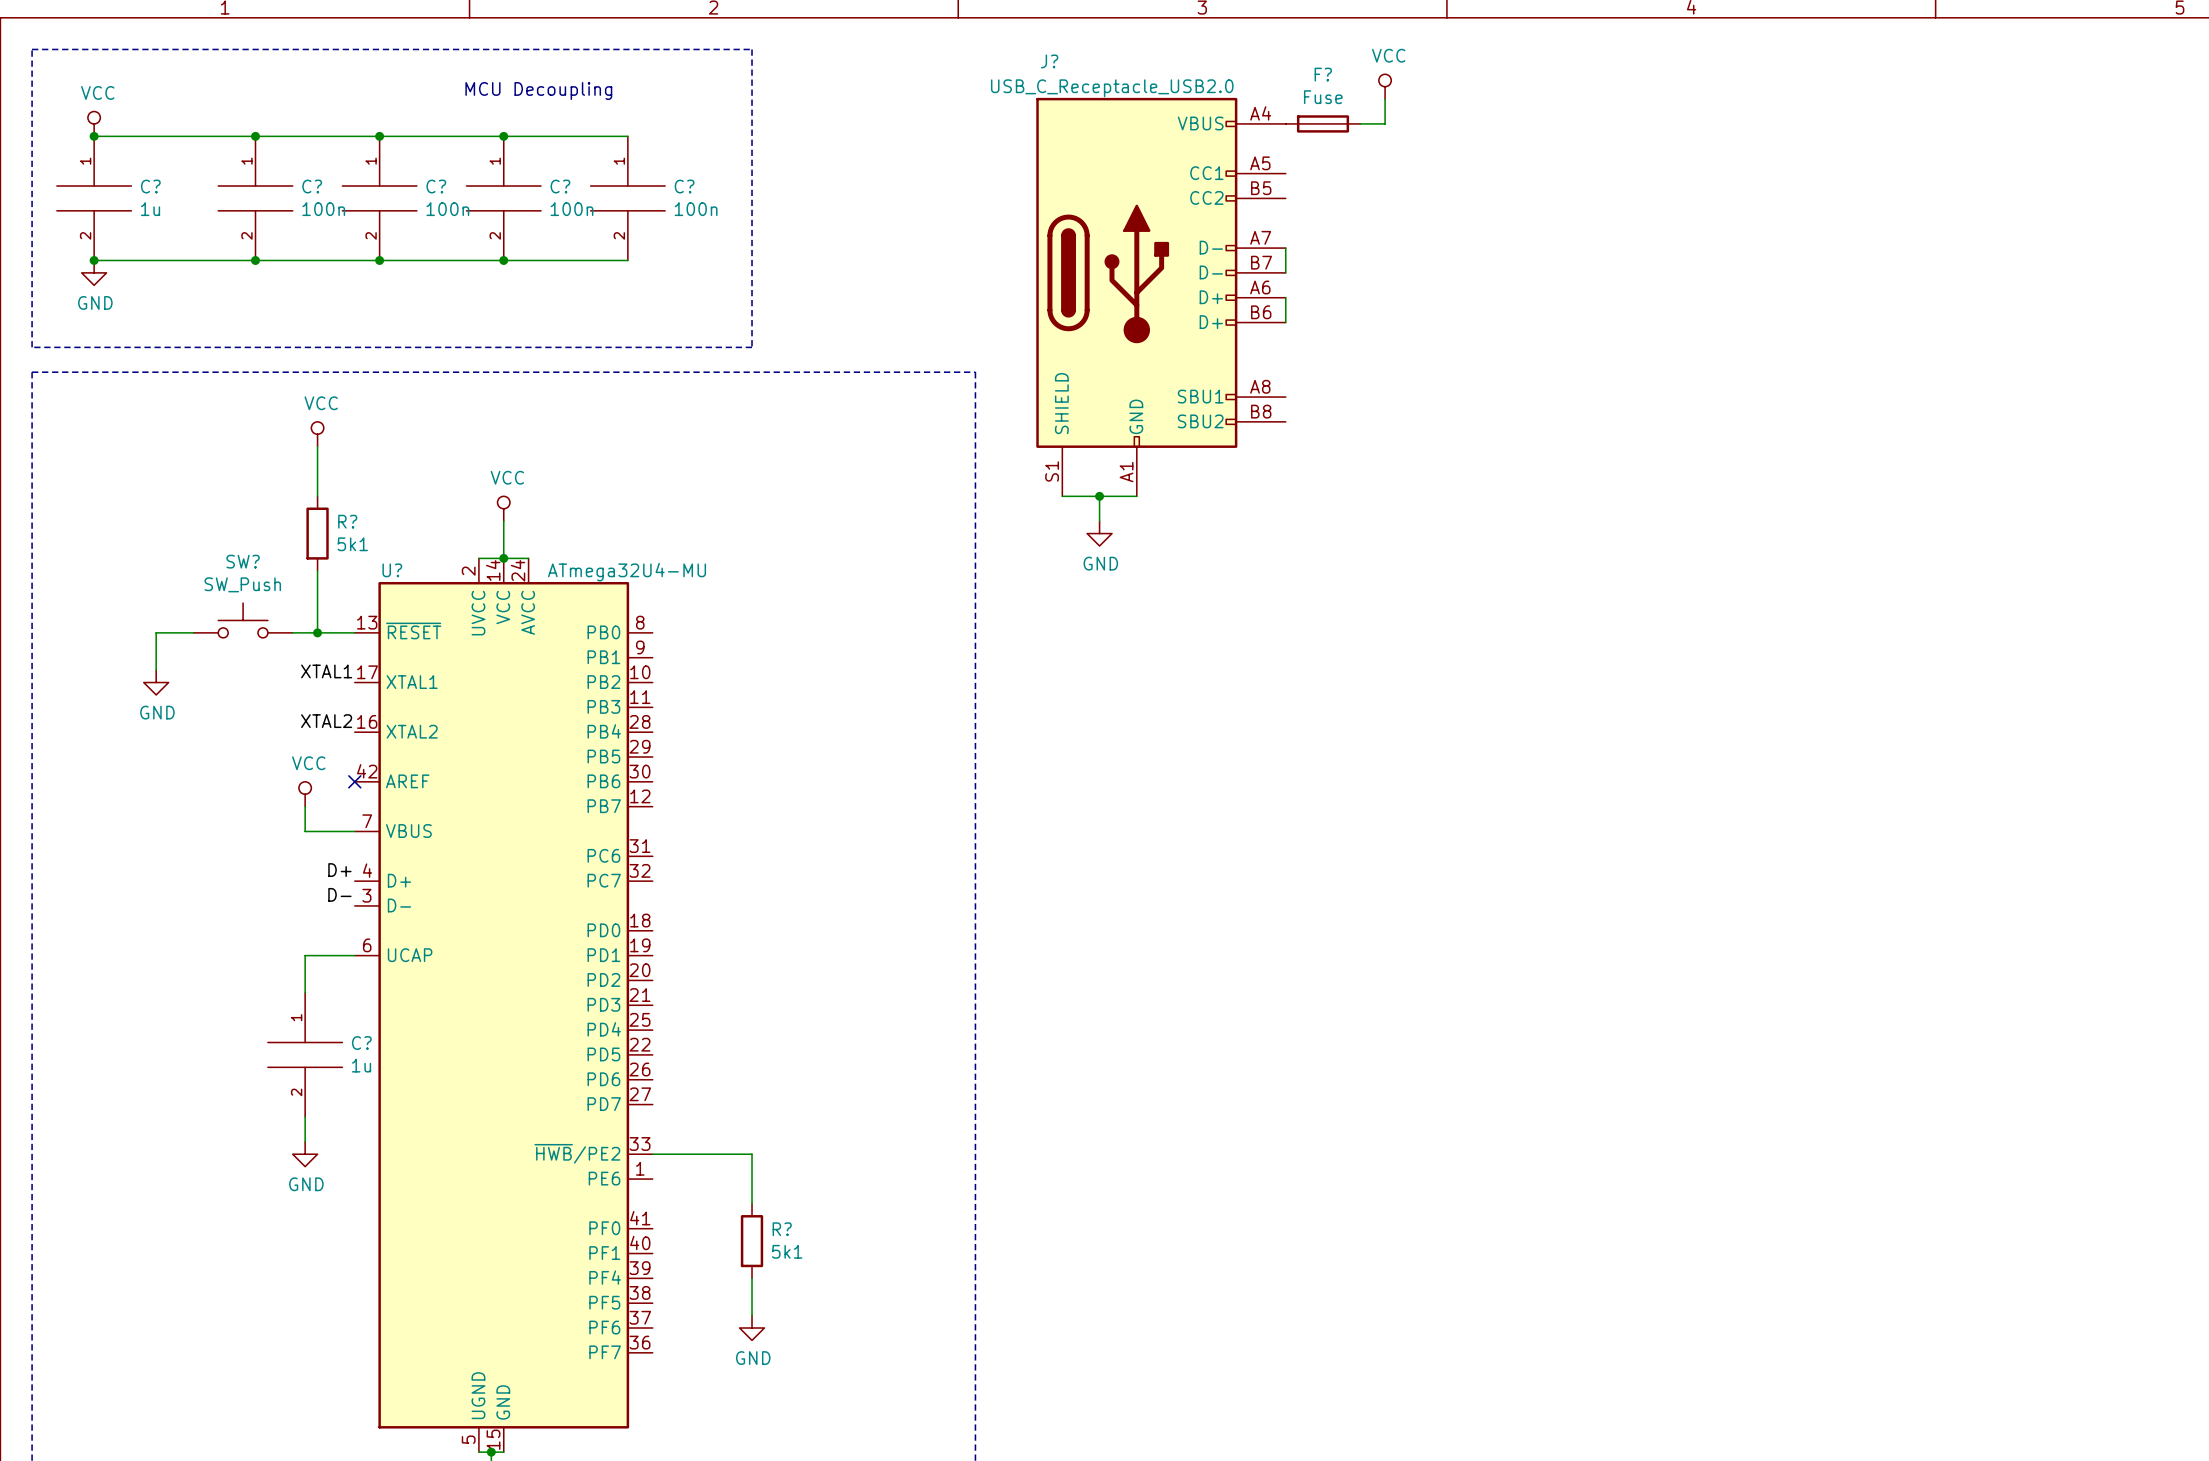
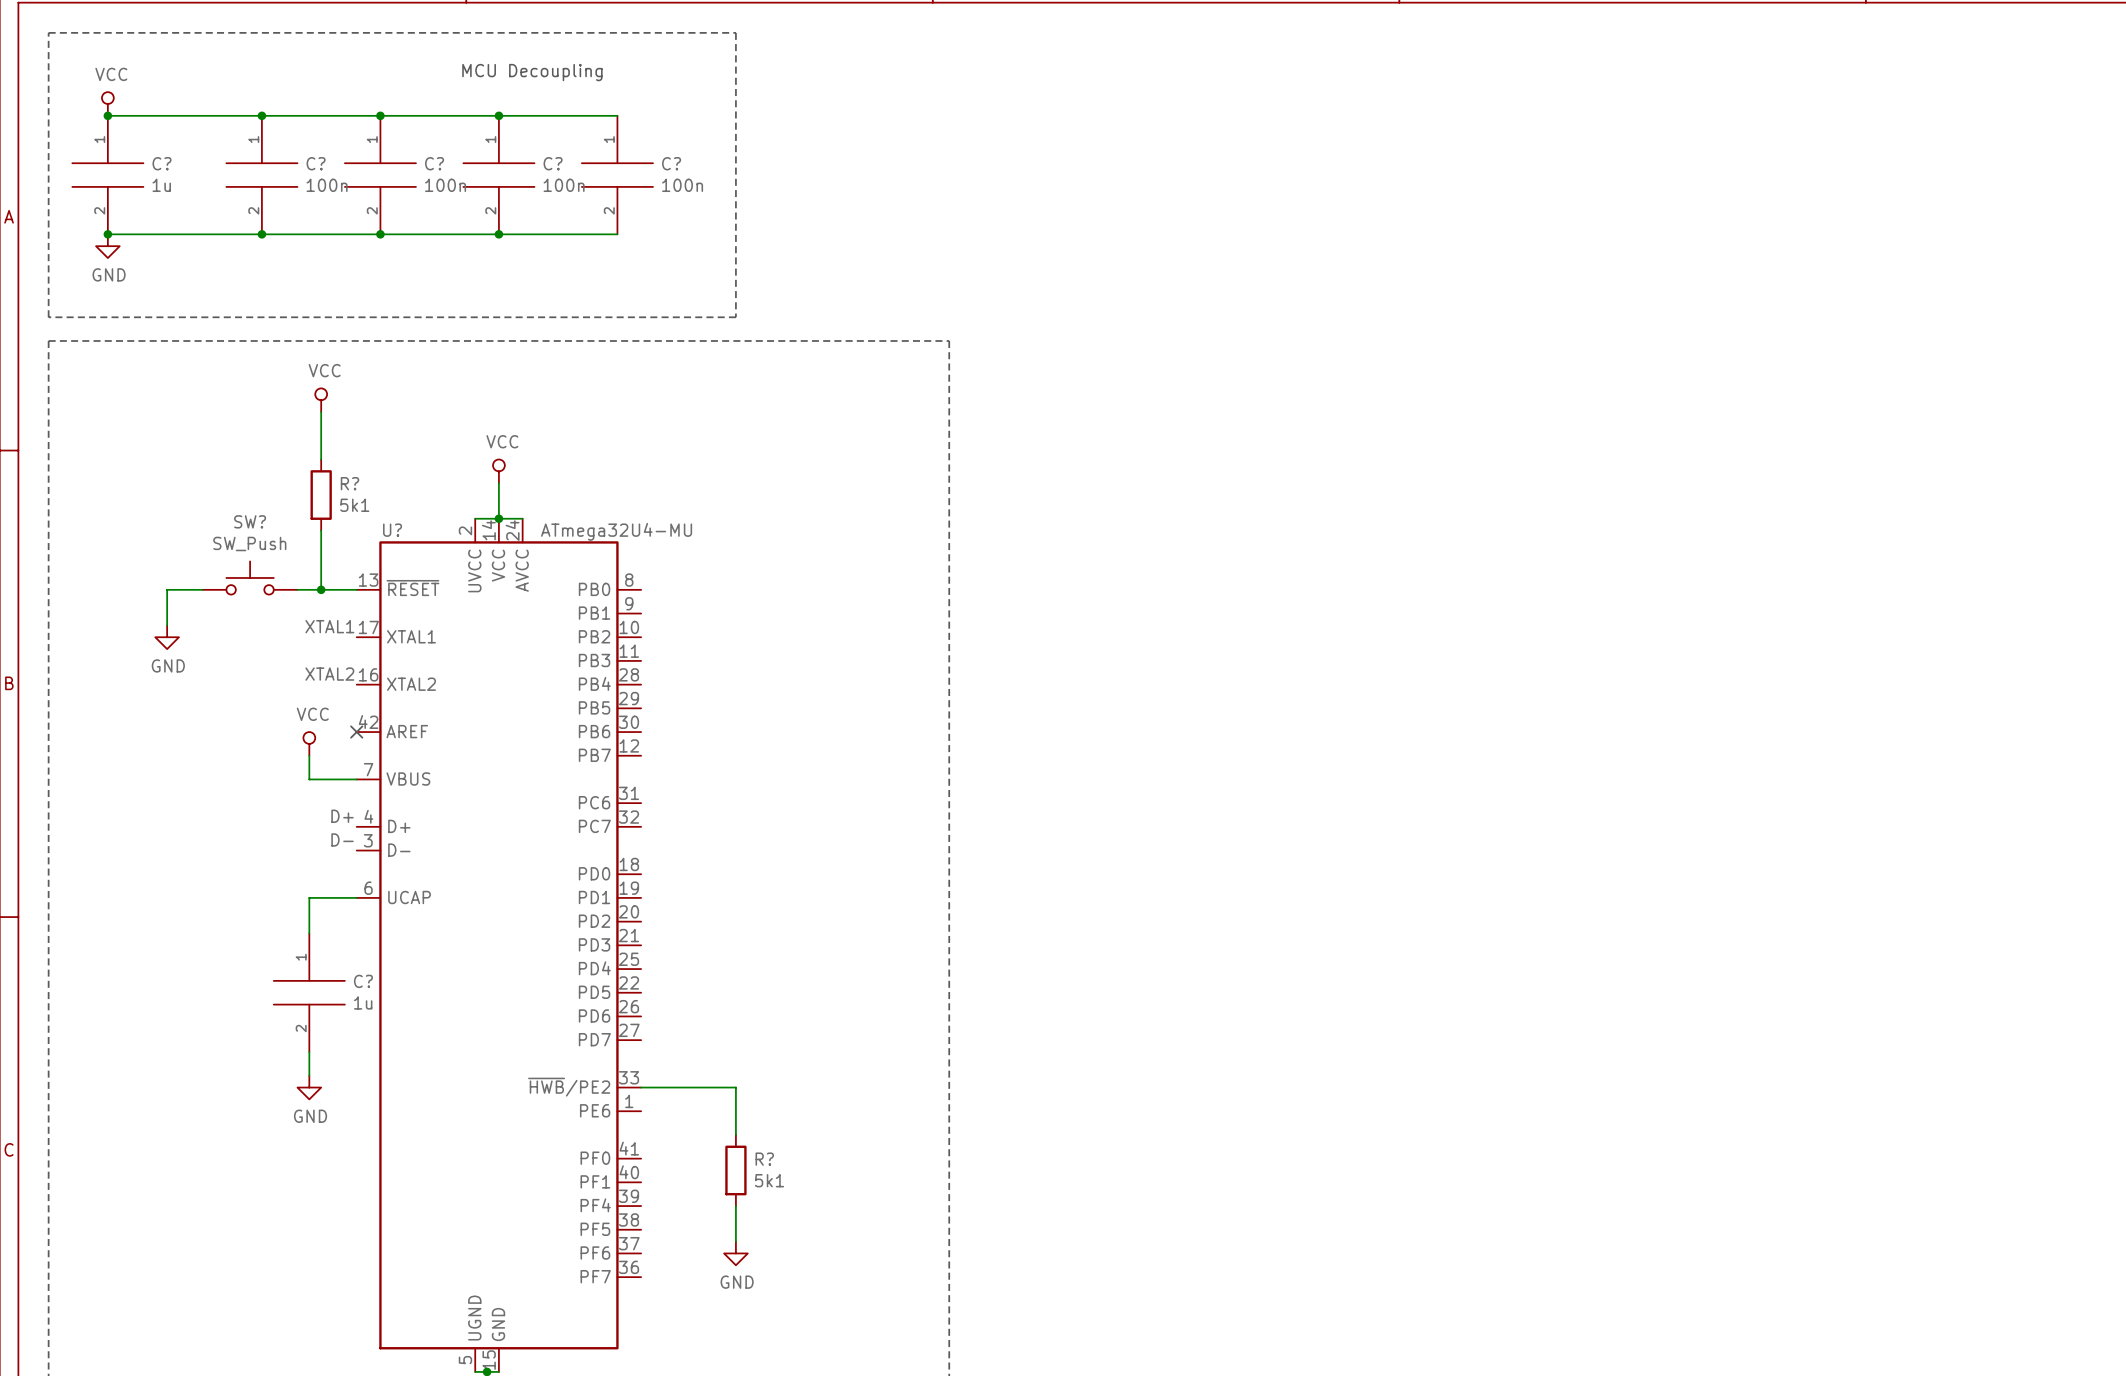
power symbol: VCC (1385, 86) -> none
wire: (1385, 99) (1385, 123) (1360, 123) -> none
F?: Fuse (1323, 123) -> none
wire: (1285, 248) (1285, 272) -> none
J?: USB_C_Receptacle_USB2.0 (1161, 297) -> none
wire: (1285, 297) (1285, 322) -> none
wire: (1062, 496) (1136, 496) -> none
wire: (1099, 496) (1099, 521) -> none
junction: (1099, 496) -> none
power symbol: GND (1099, 533) -> none

